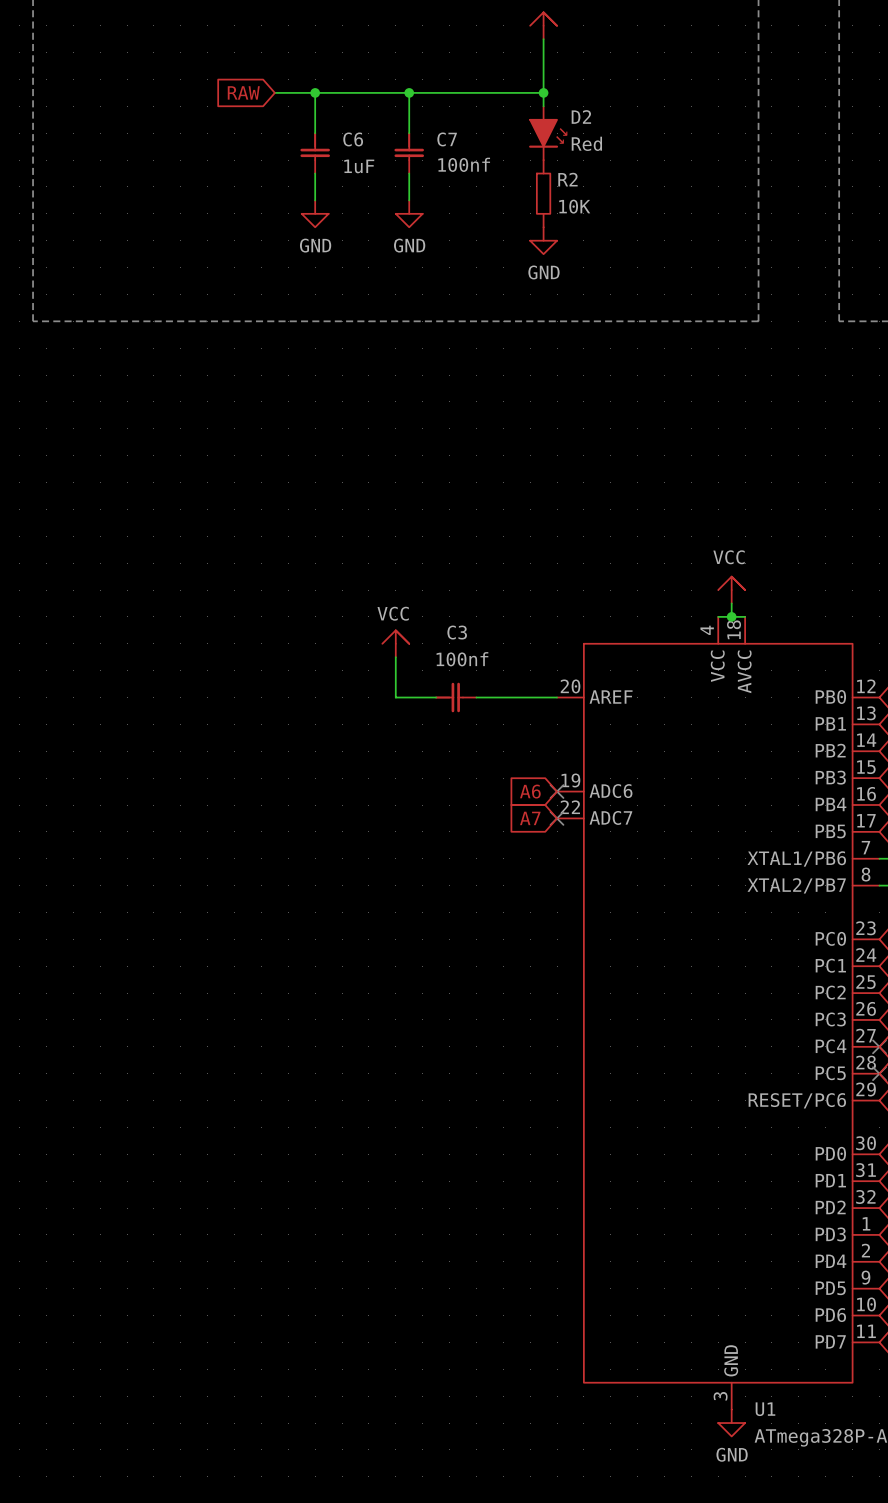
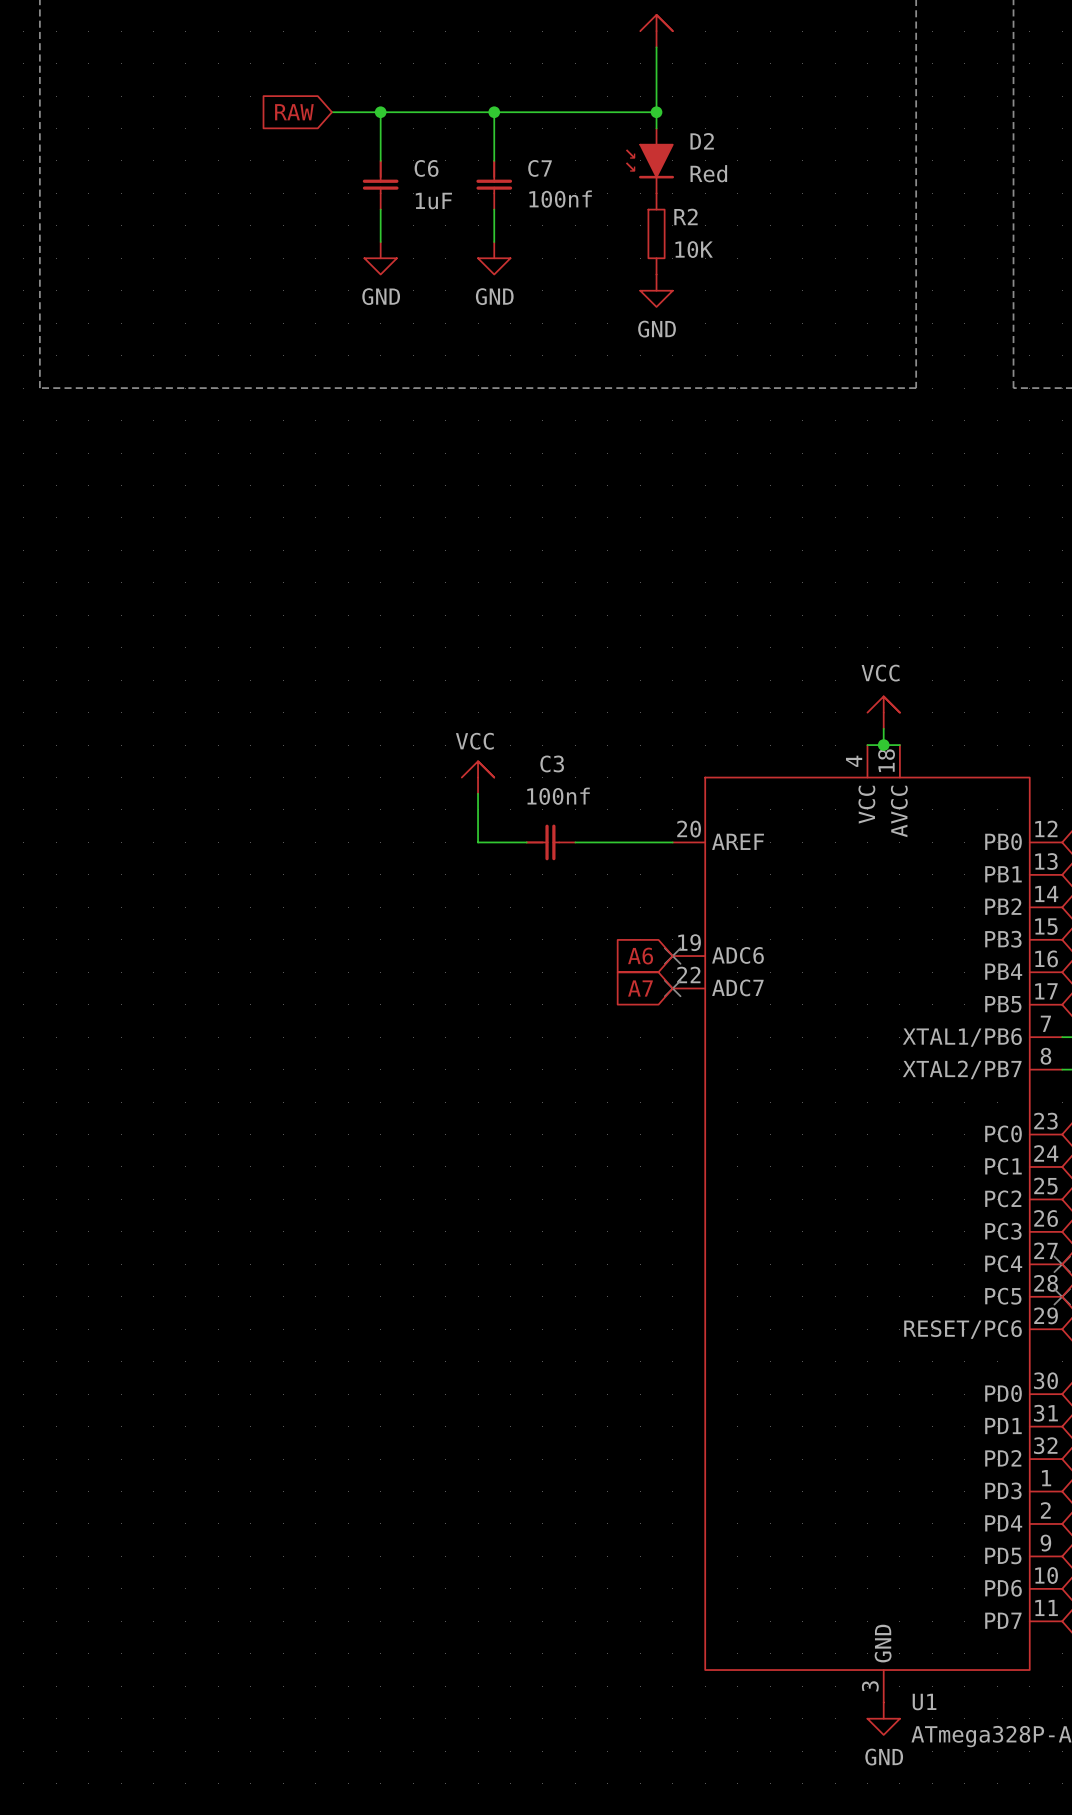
D2 text position: ↘ (563, 131) -> ↘ (630, 166)
D2 text position: ↘ (560, 139) -> ↘ (630, 153)

